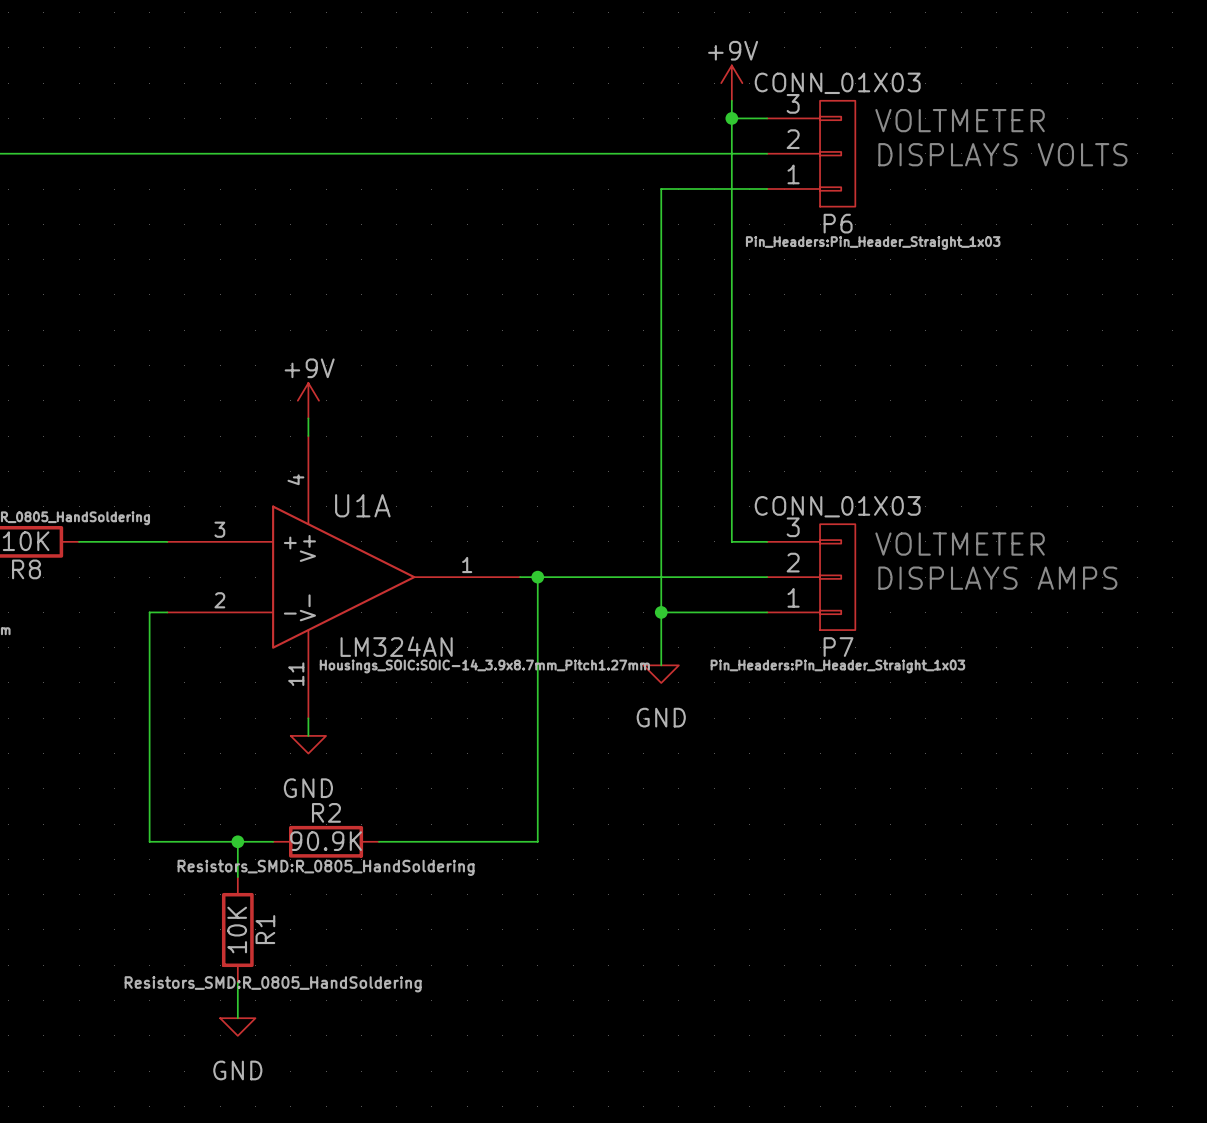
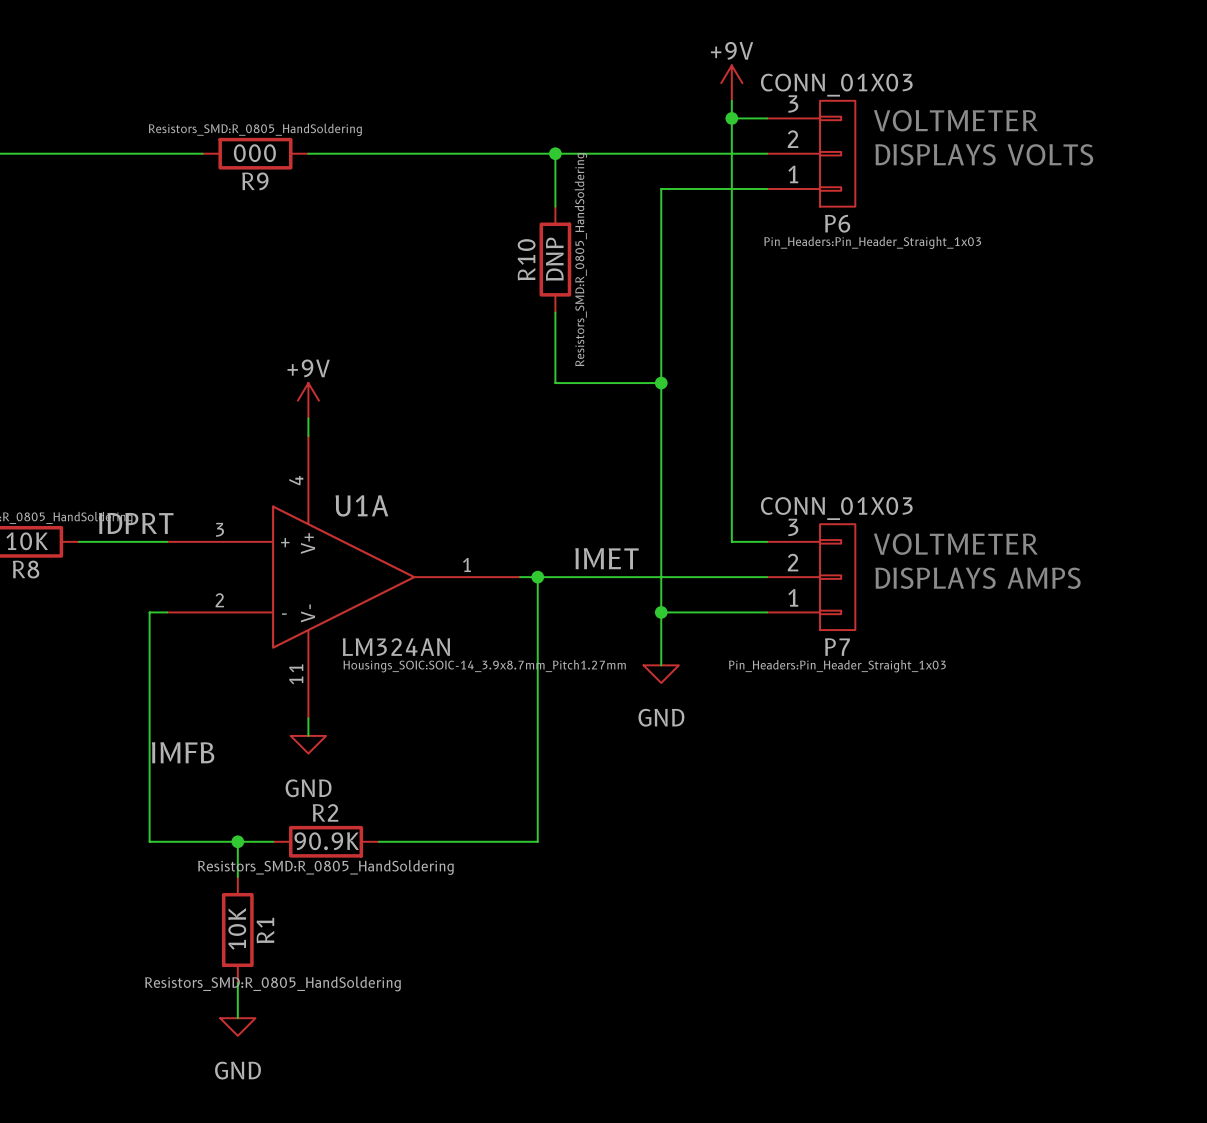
wire: (202, 153) (308, 153) -> none
R9: none -> 000 (255, 153)
wire: none -> (555, 153) (555, 206)
junction: none -> (555, 153)
R10: none -> DNP (555, 259)
wire: none -> (555, 312) (555, 383) (661, 383)
junction: none -> (661, 383)
label: none -> IDPRT (136, 523)
label: none -> IMET (606, 558)
label: none -> IMFB (183, 752)

